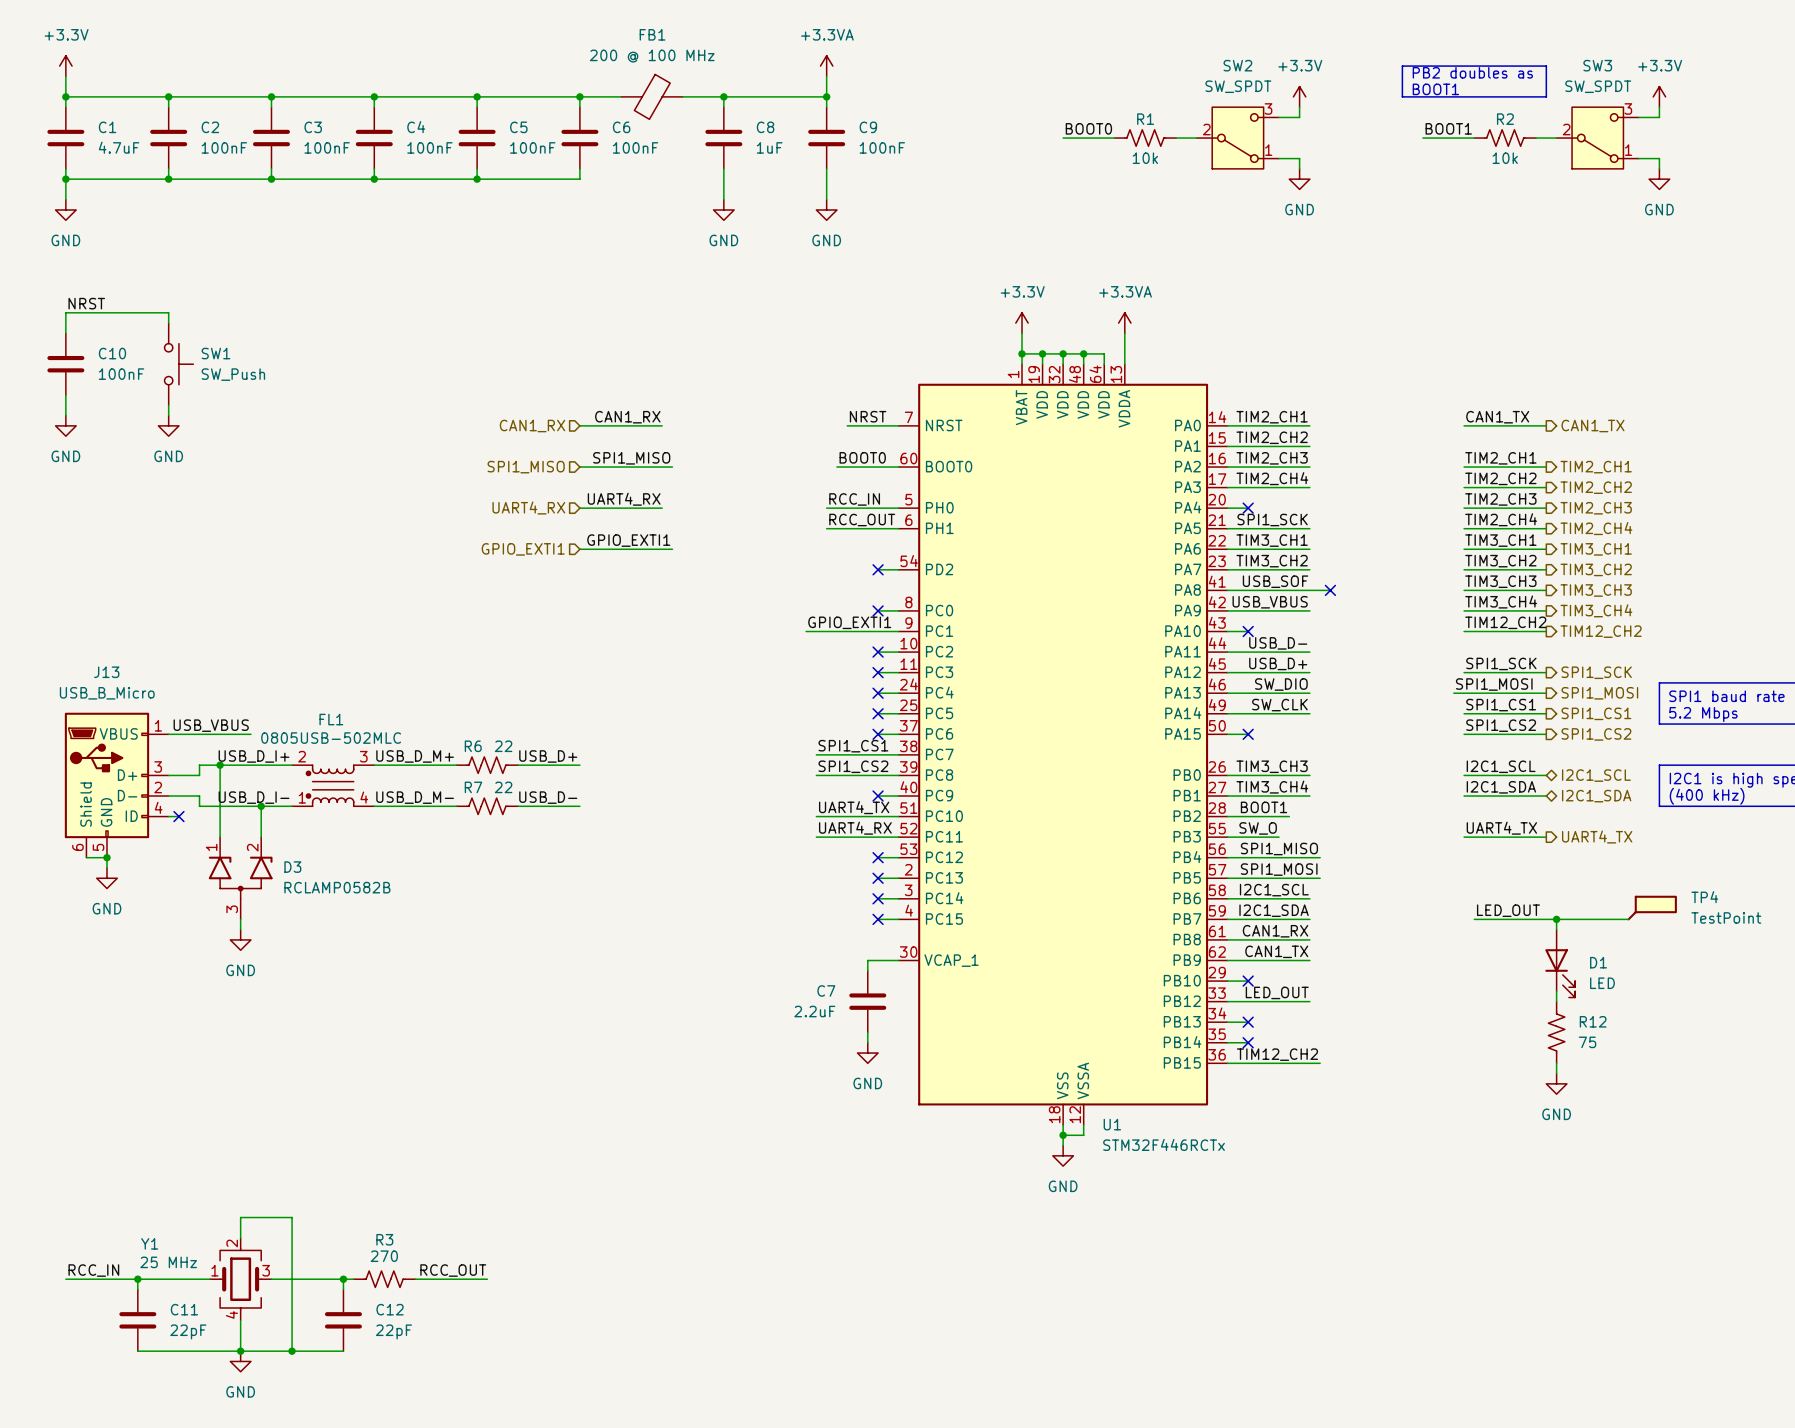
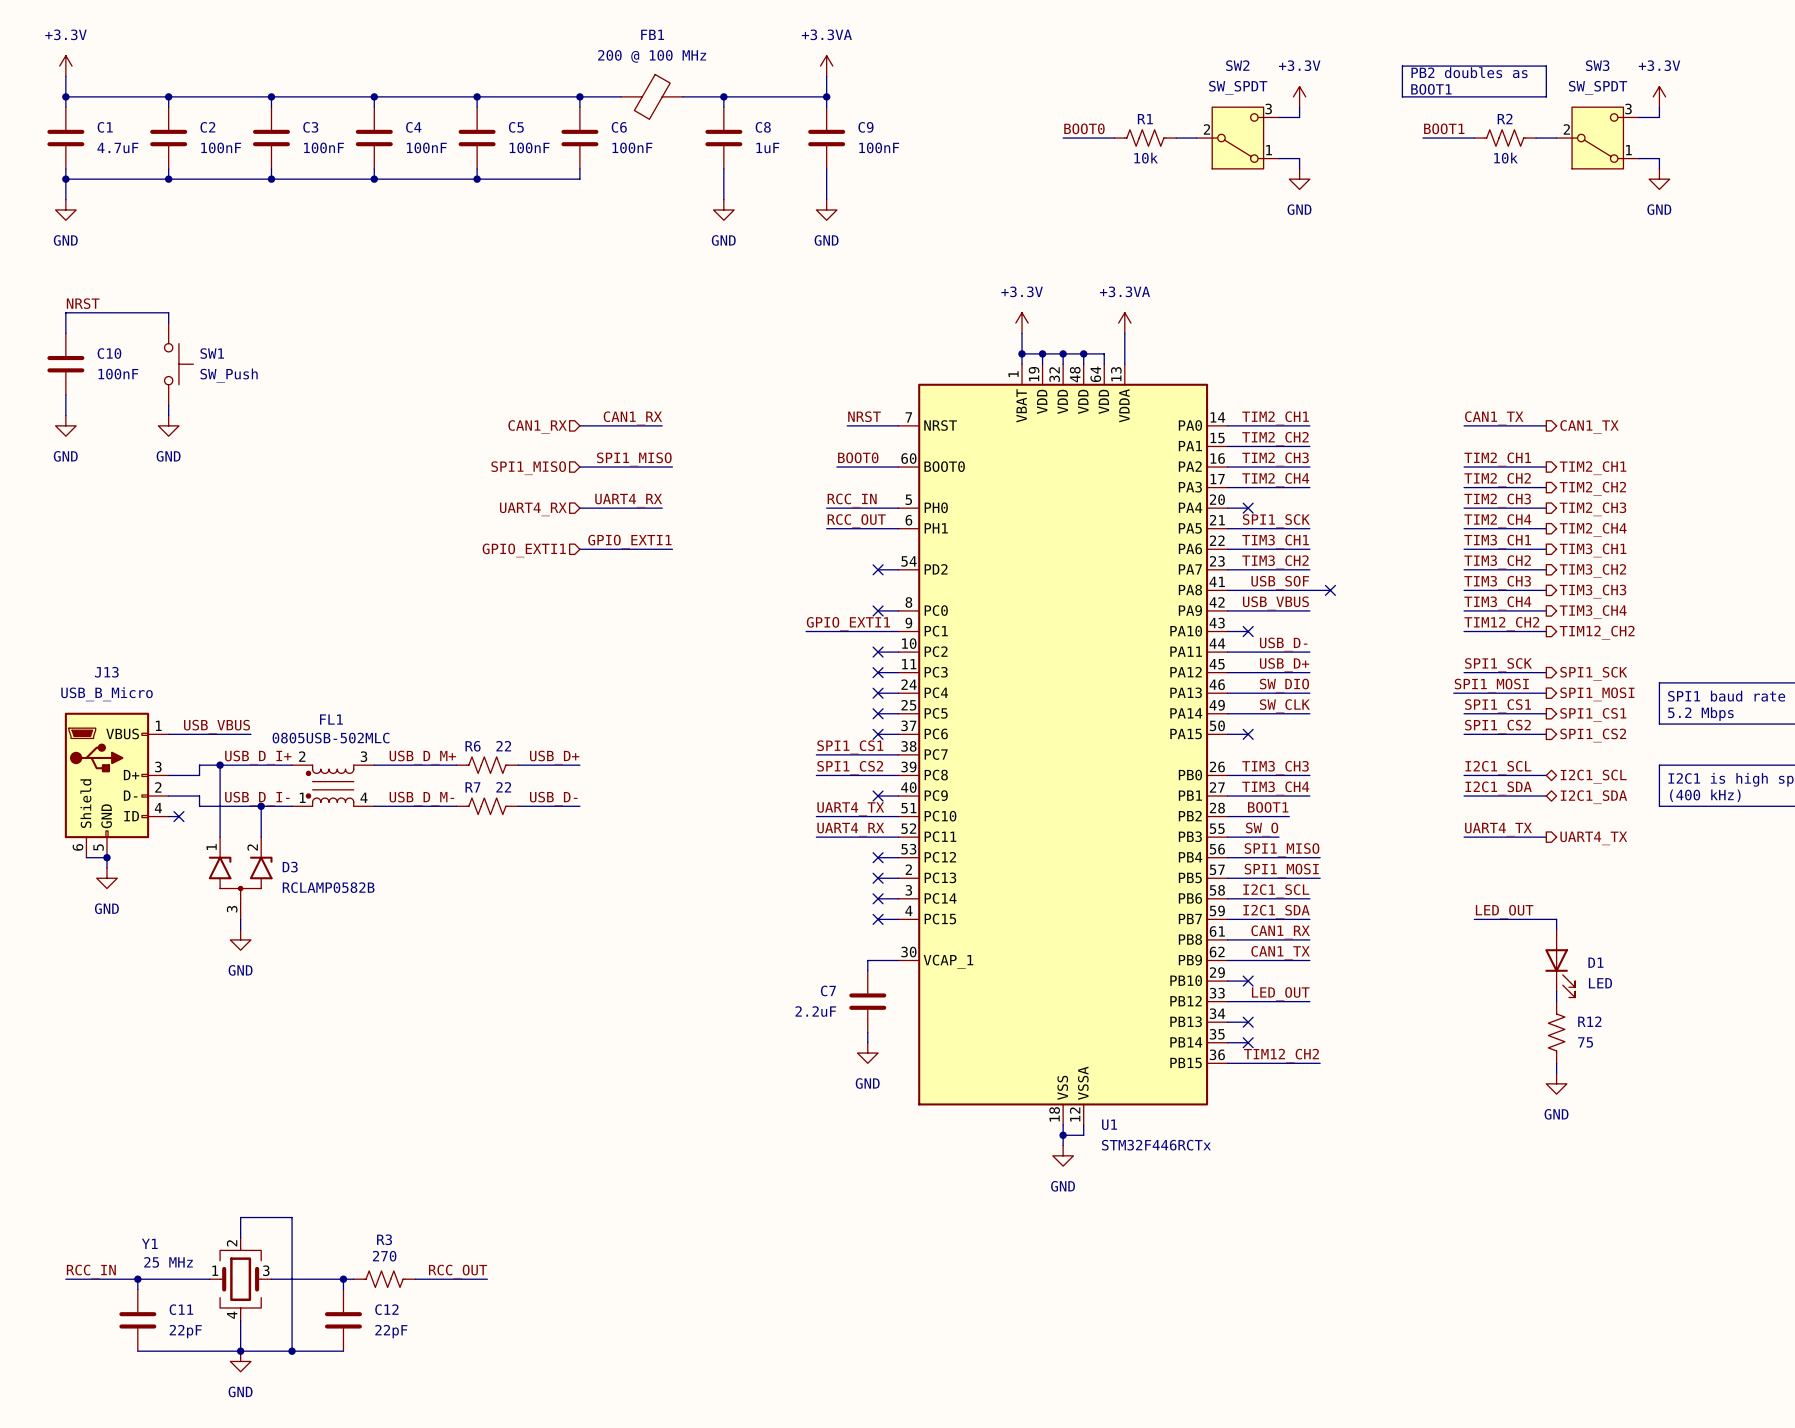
TP4: TestPoint (1652, 908) -> none
wire: (1556, 919) (1628, 919) -> none
junction: (1556, 919) -> none

